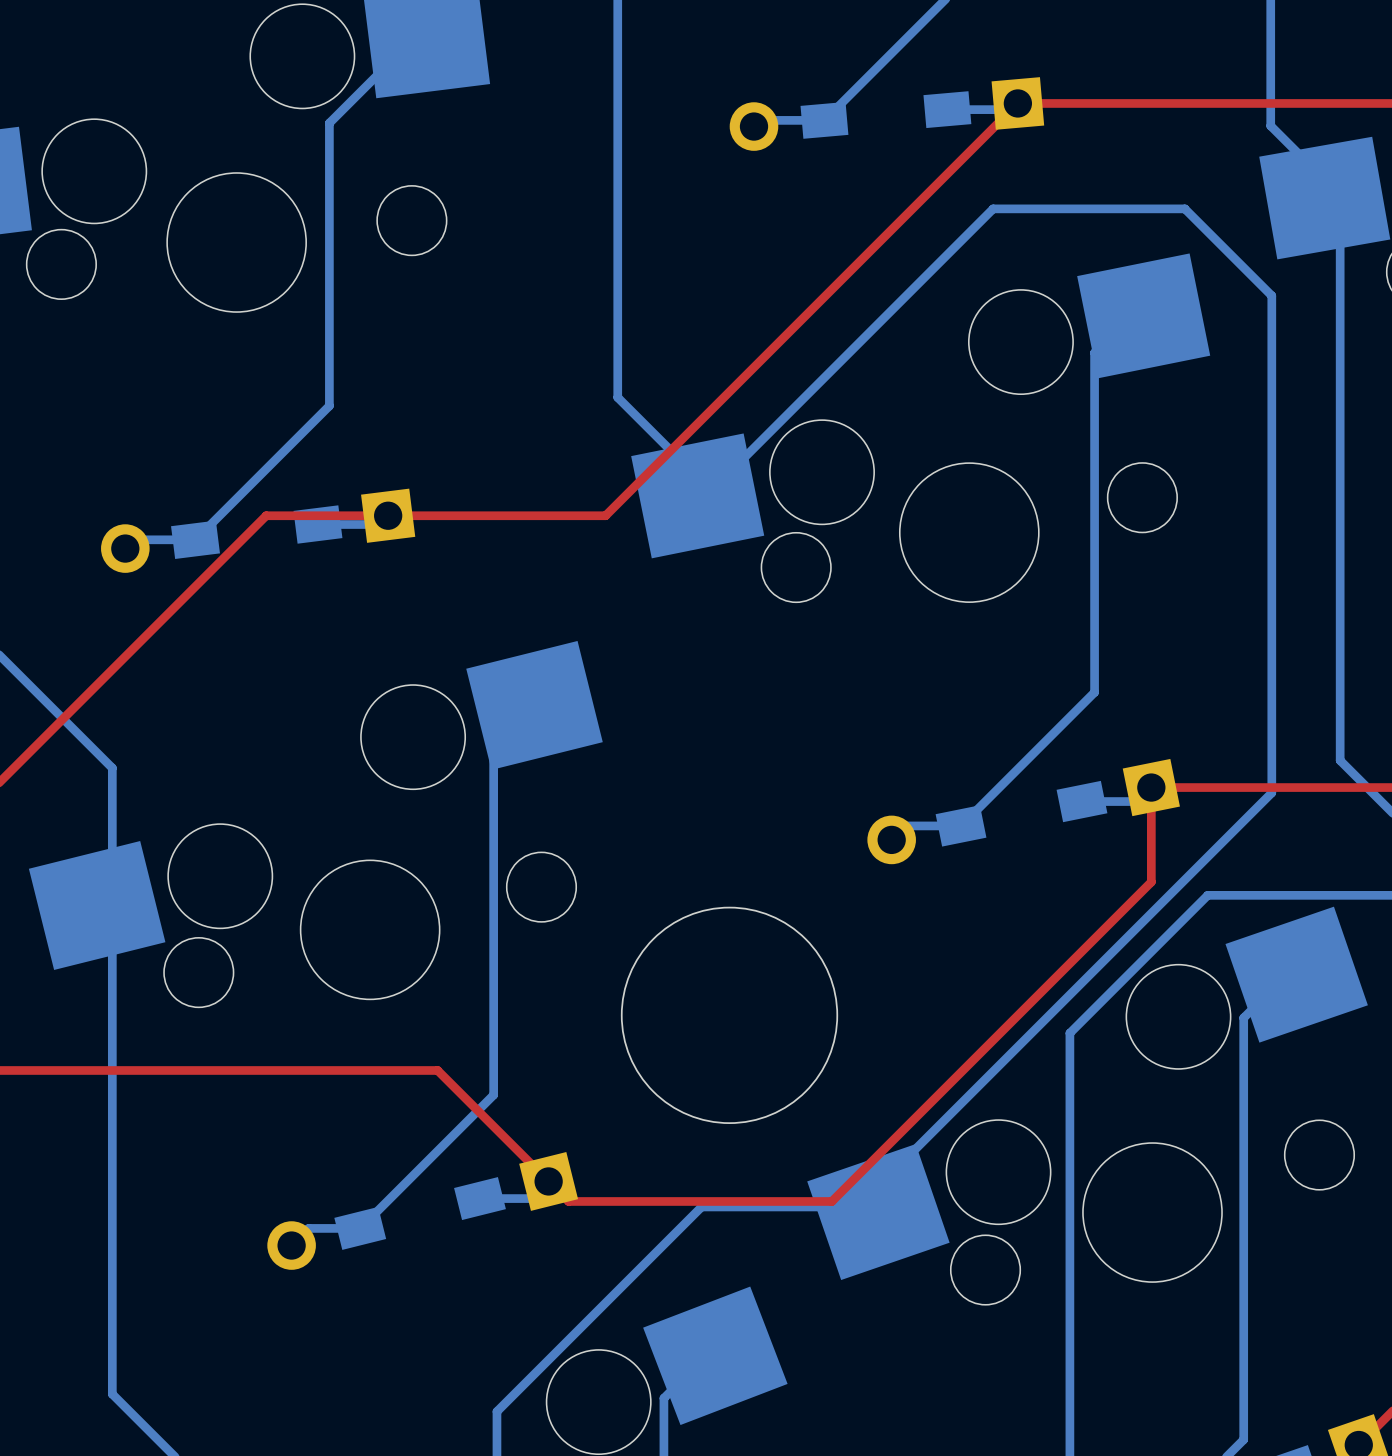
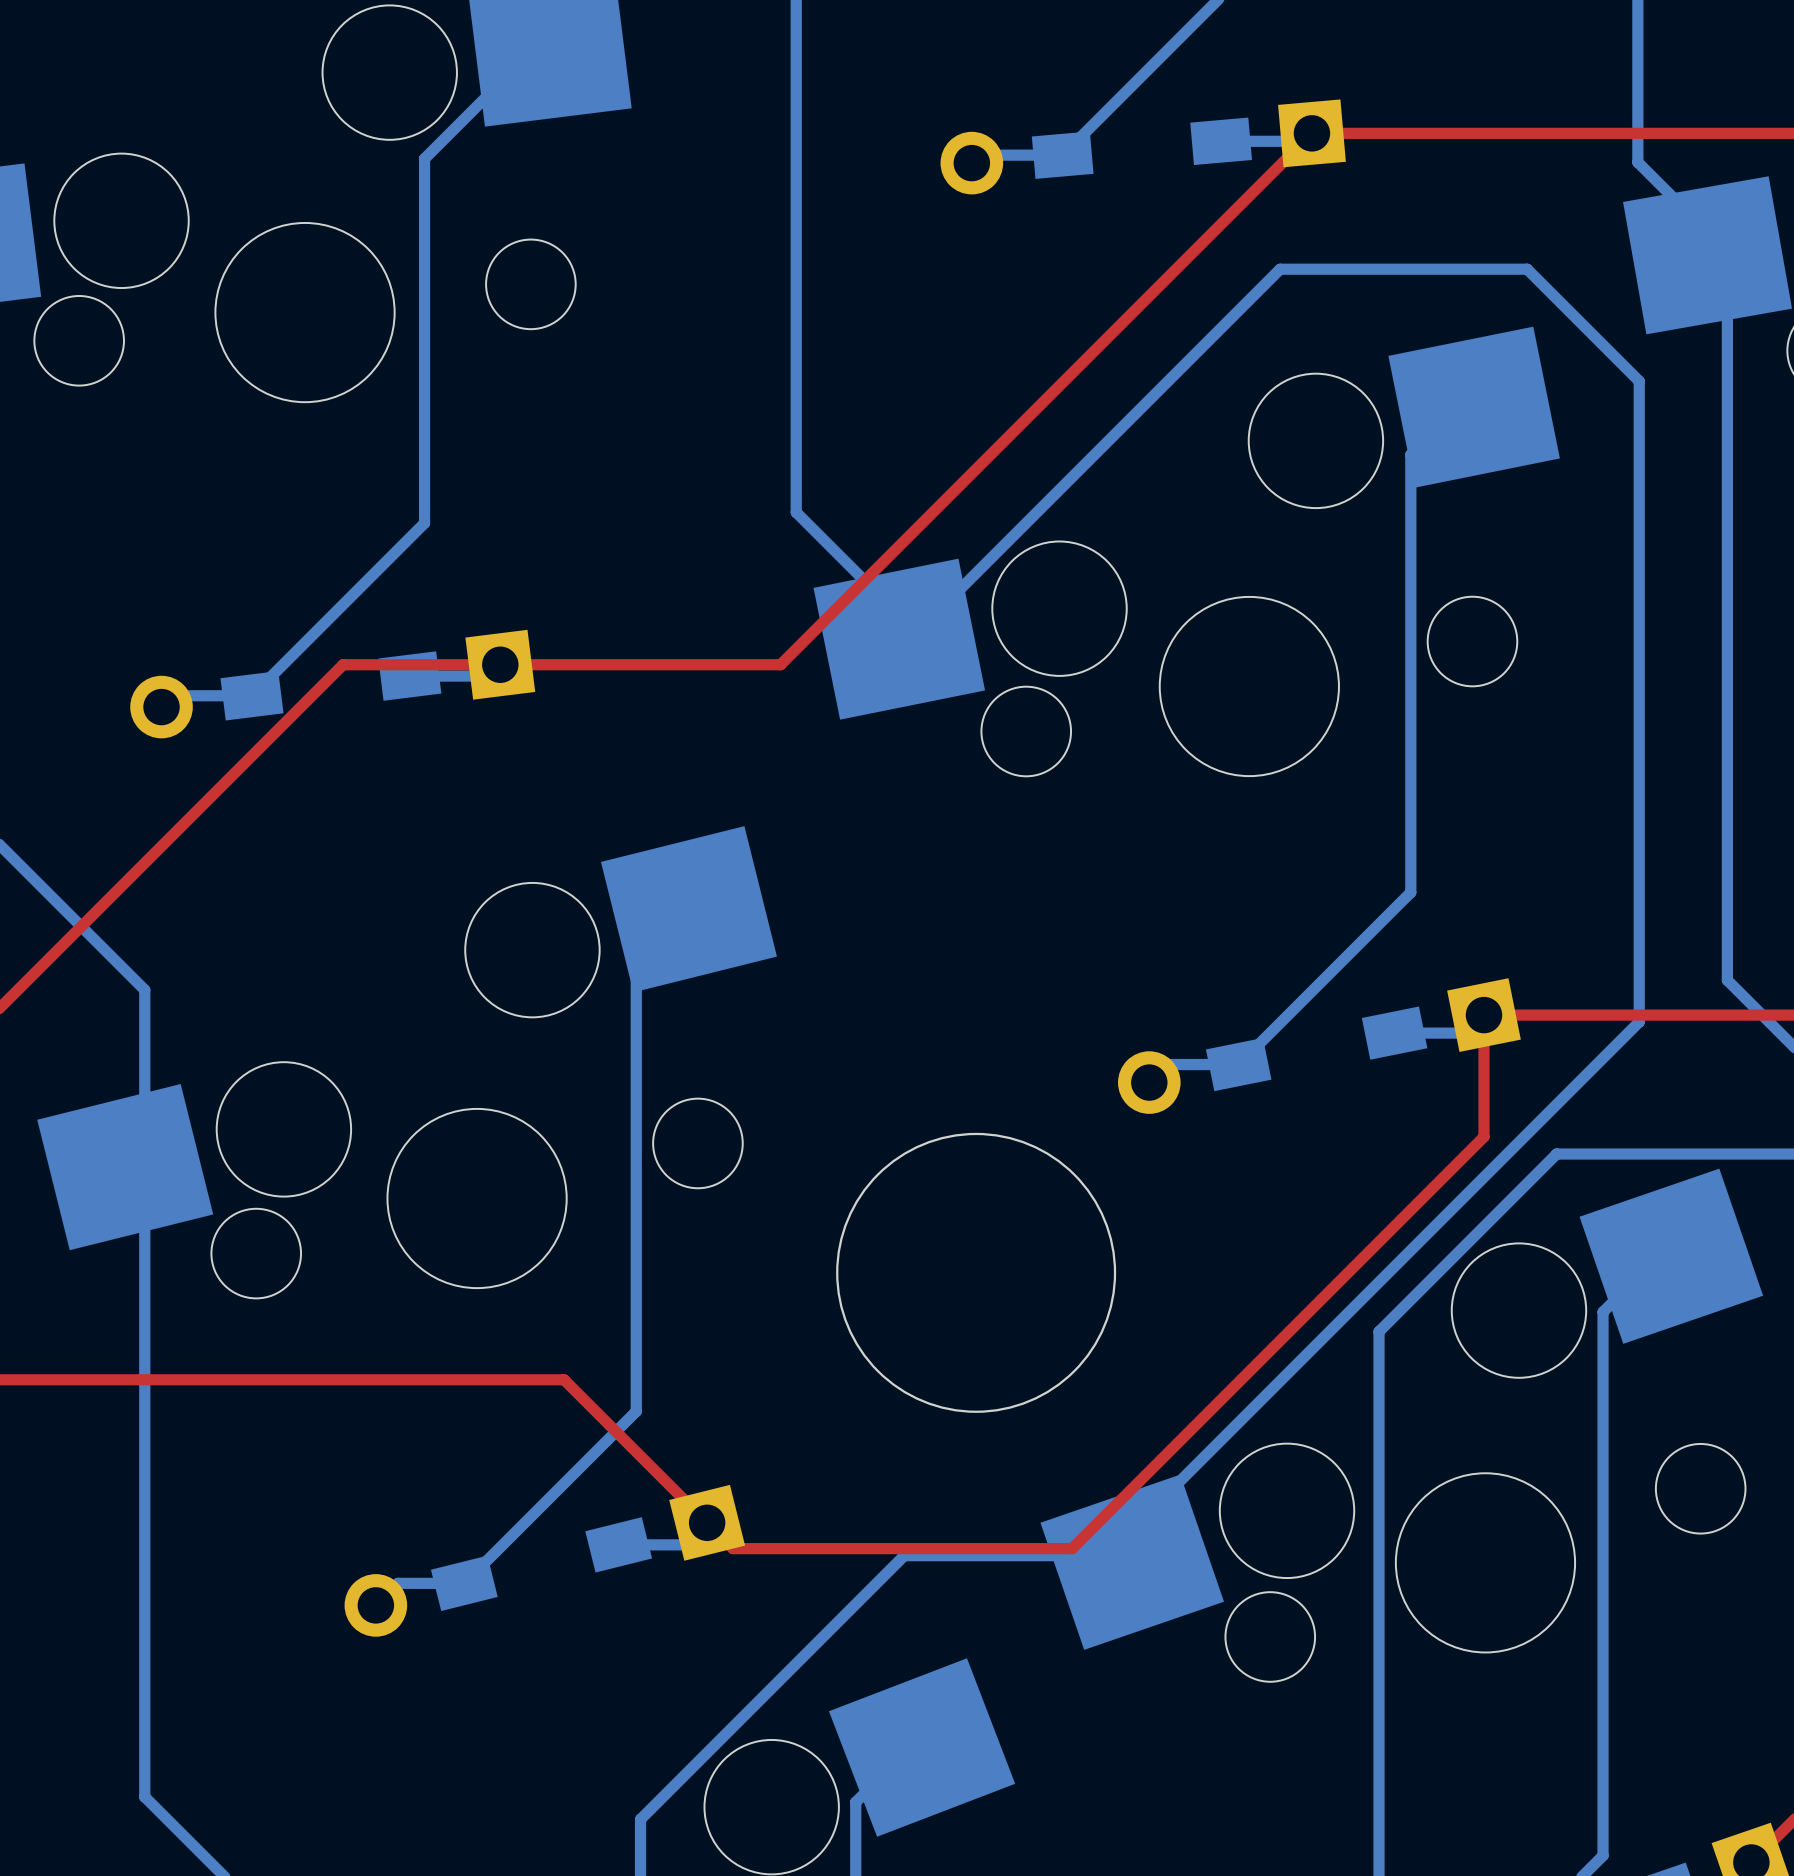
round board edge position: (729, 1015) -> (976, 1272)

